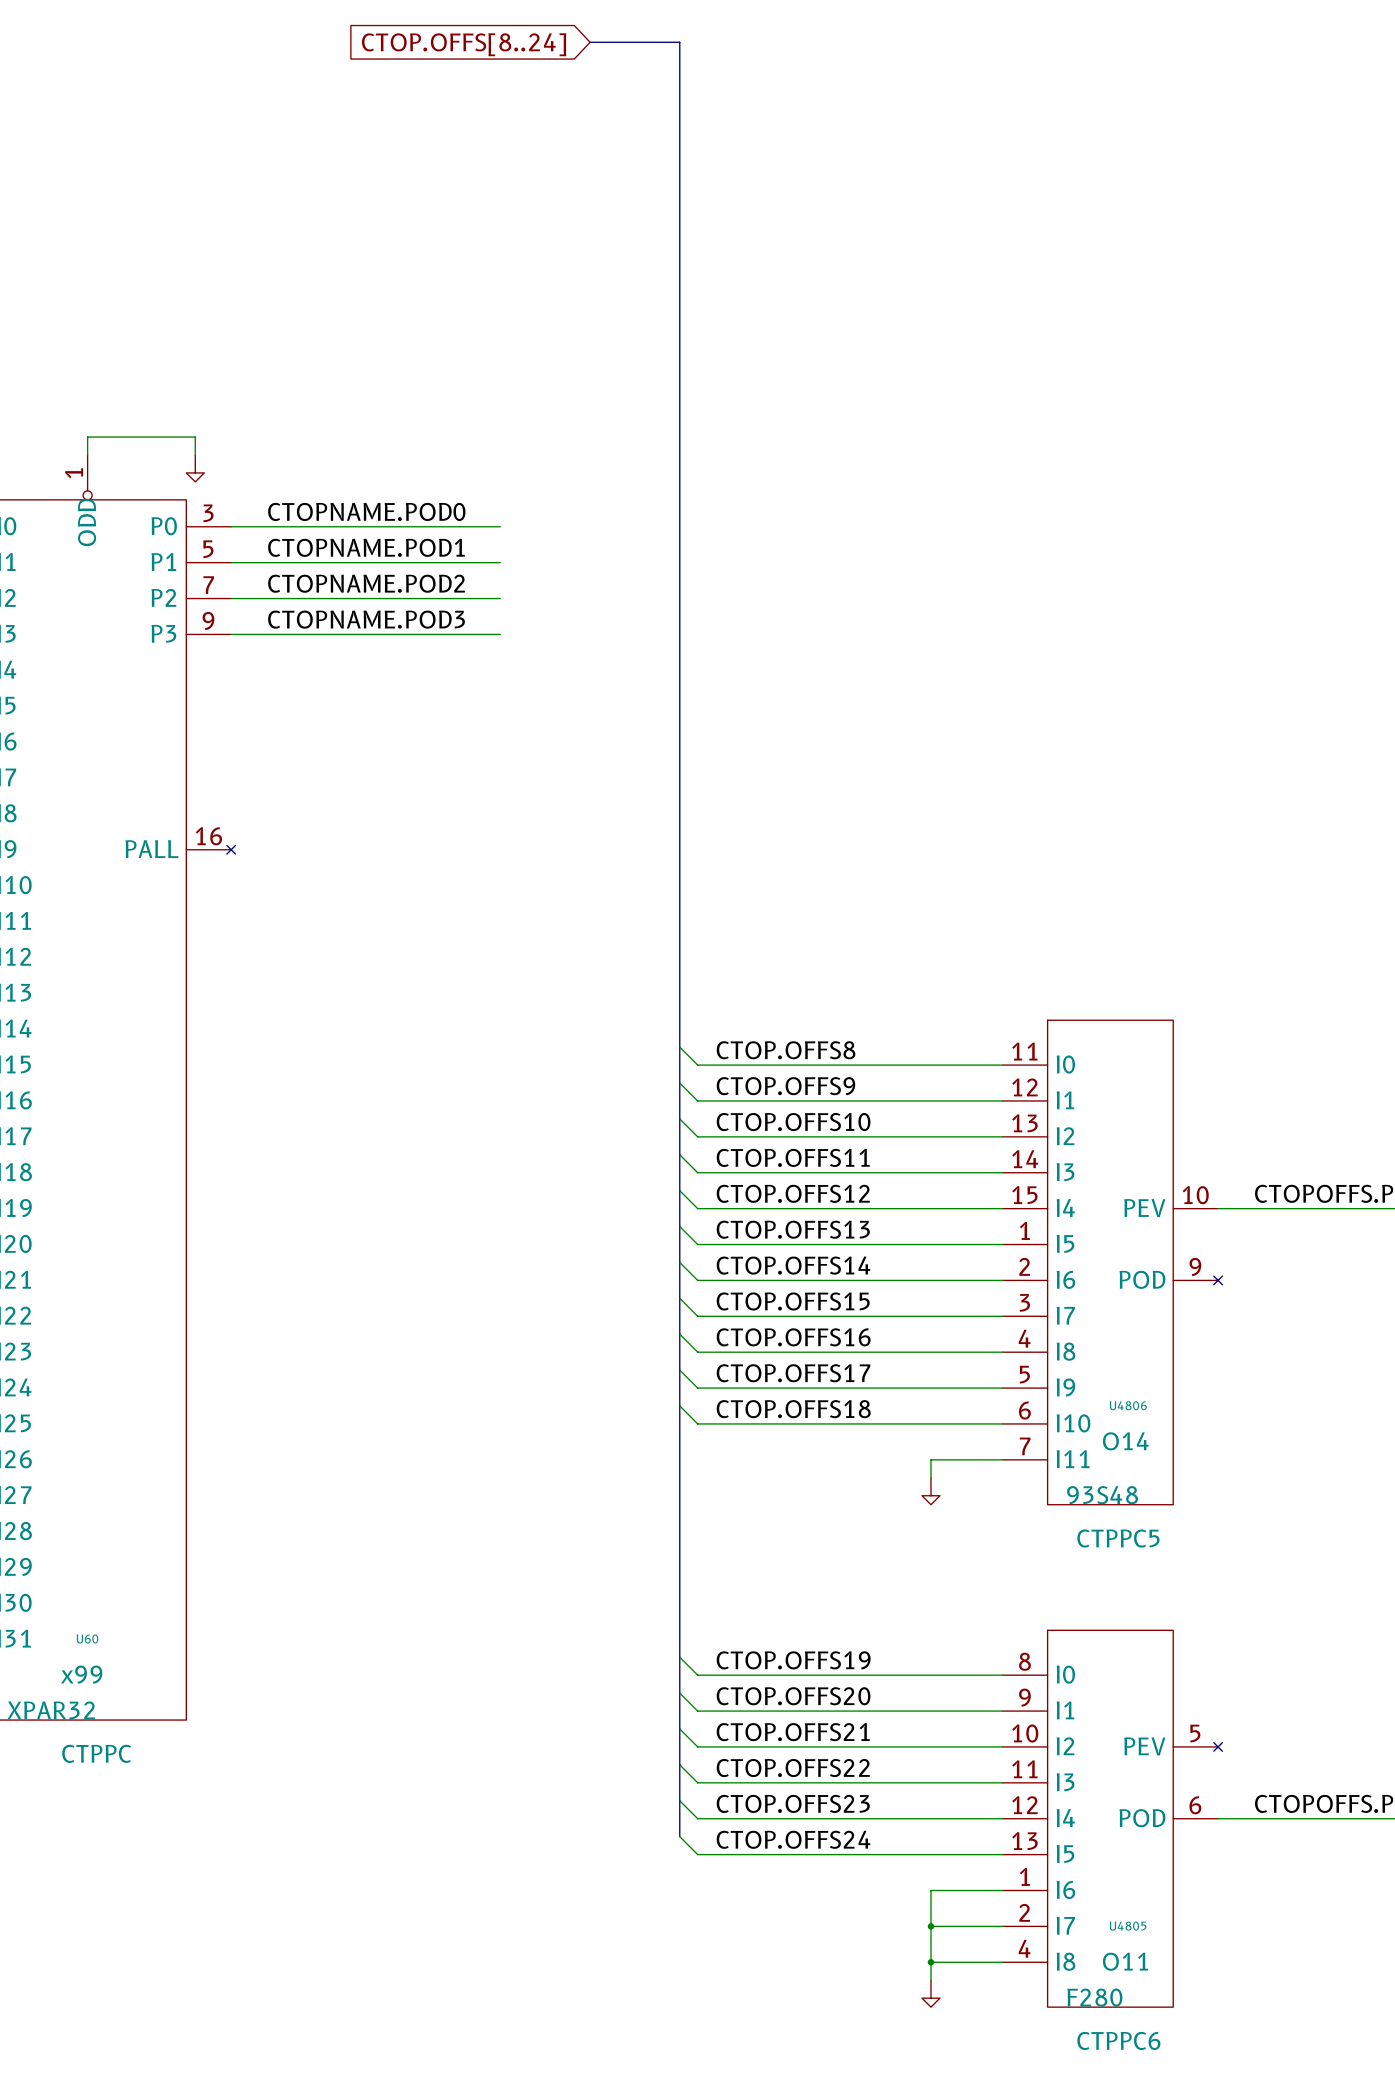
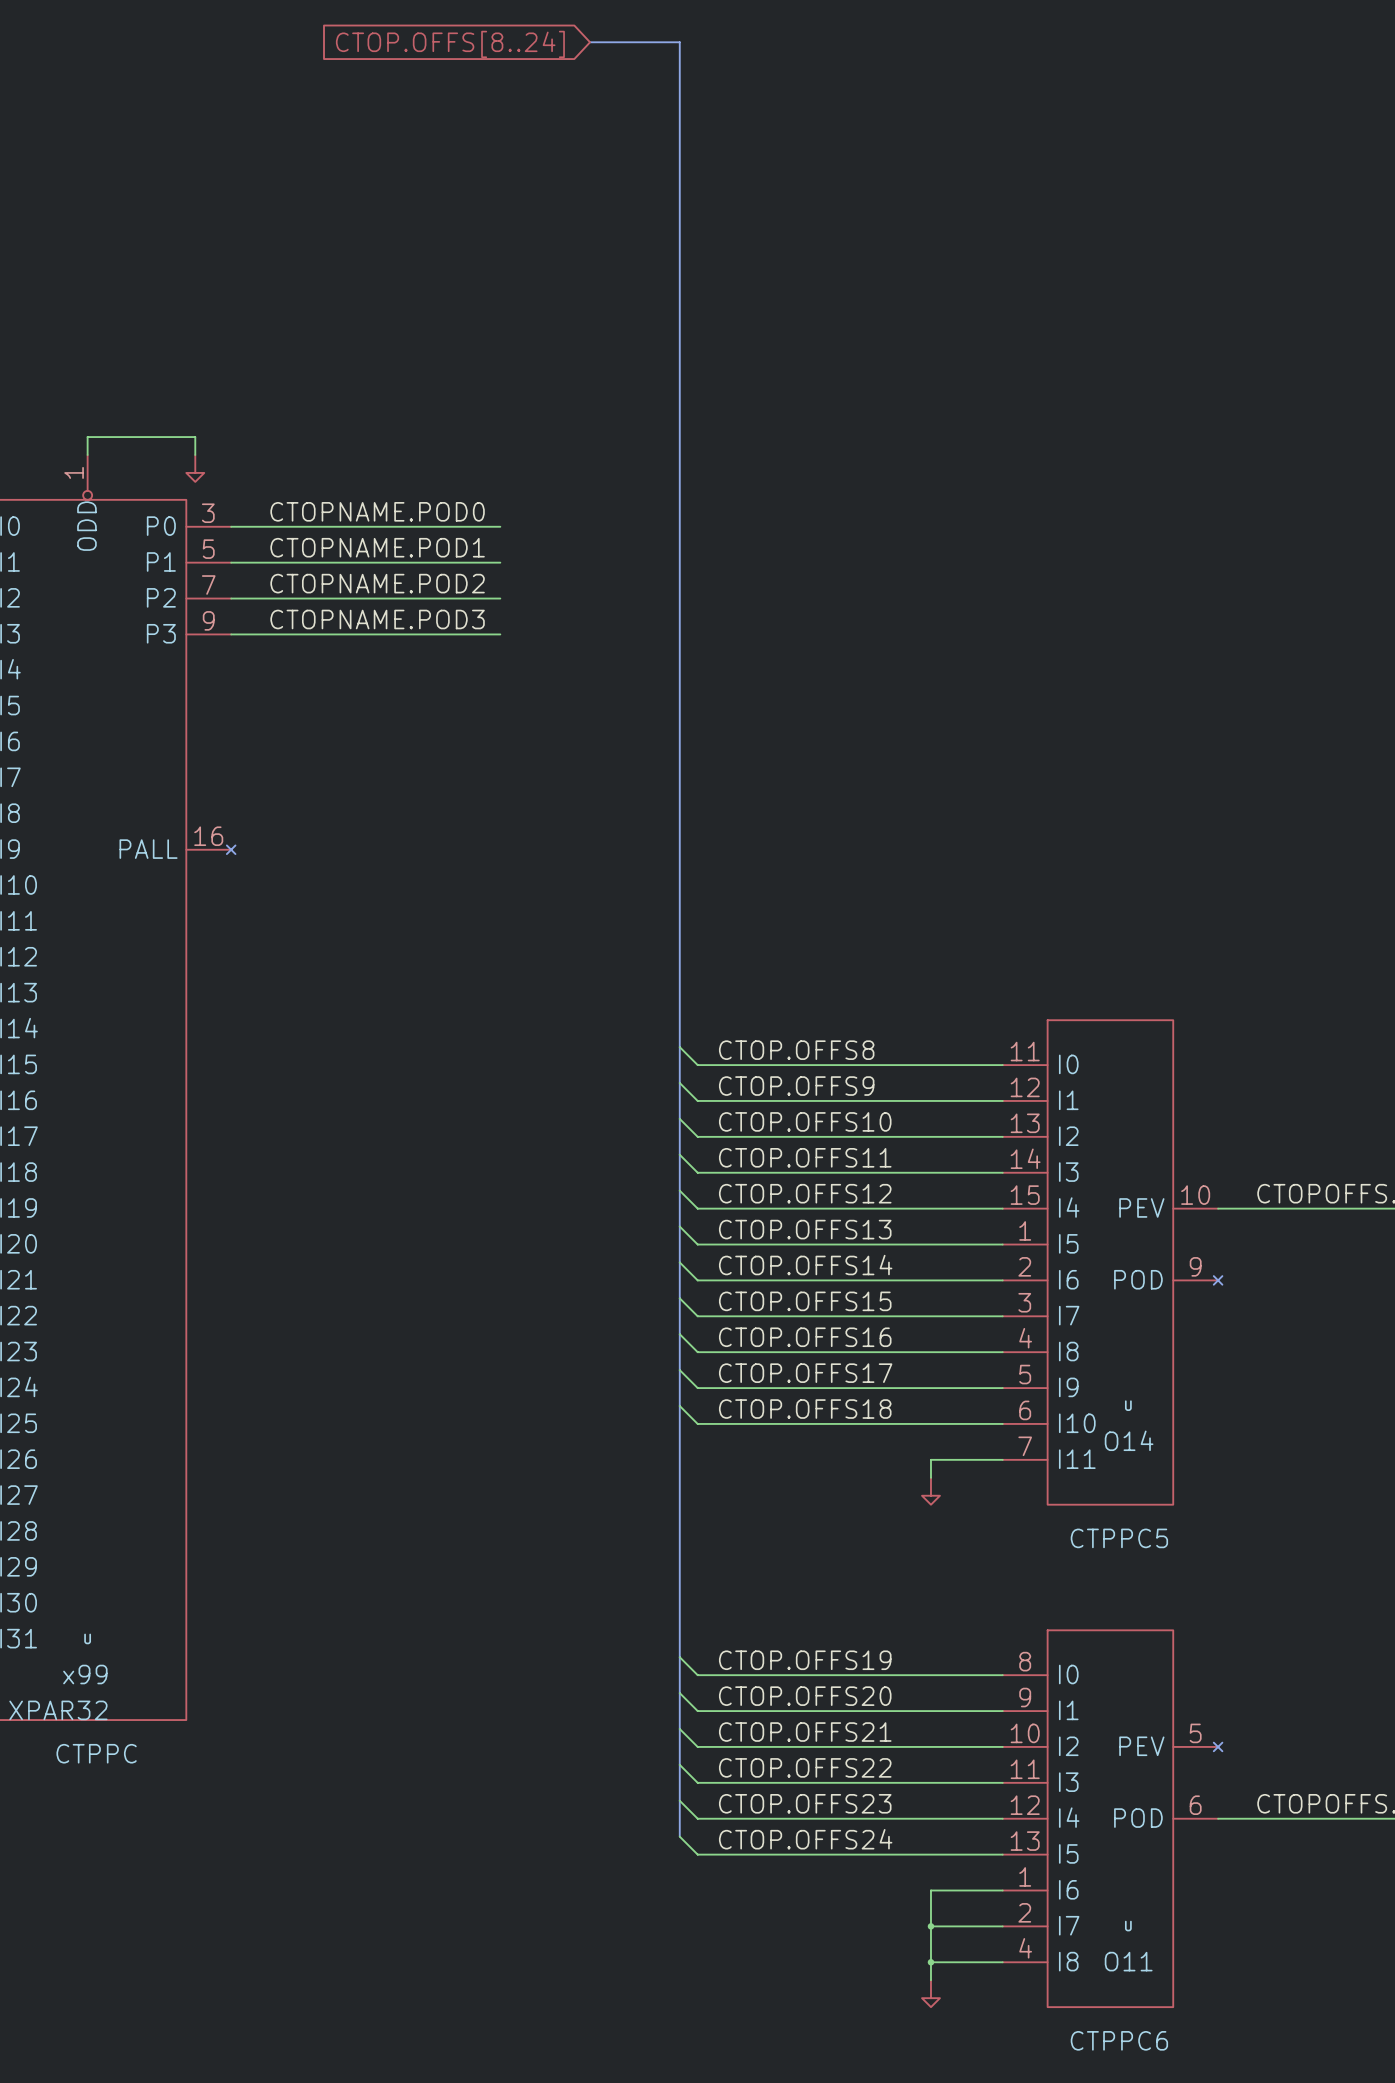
U4806 name: U4806 (1128, 1405) -> U (1128, 1405)
U4806 value: 93S48 (1102, 1495) -> none
U60 name: U60 (87, 1639) -> U (87, 1638)
U4805 name: U4805 (1128, 1926) -> U (1128, 1926)
U4805 value: F280 (1094, 1997) -> none

